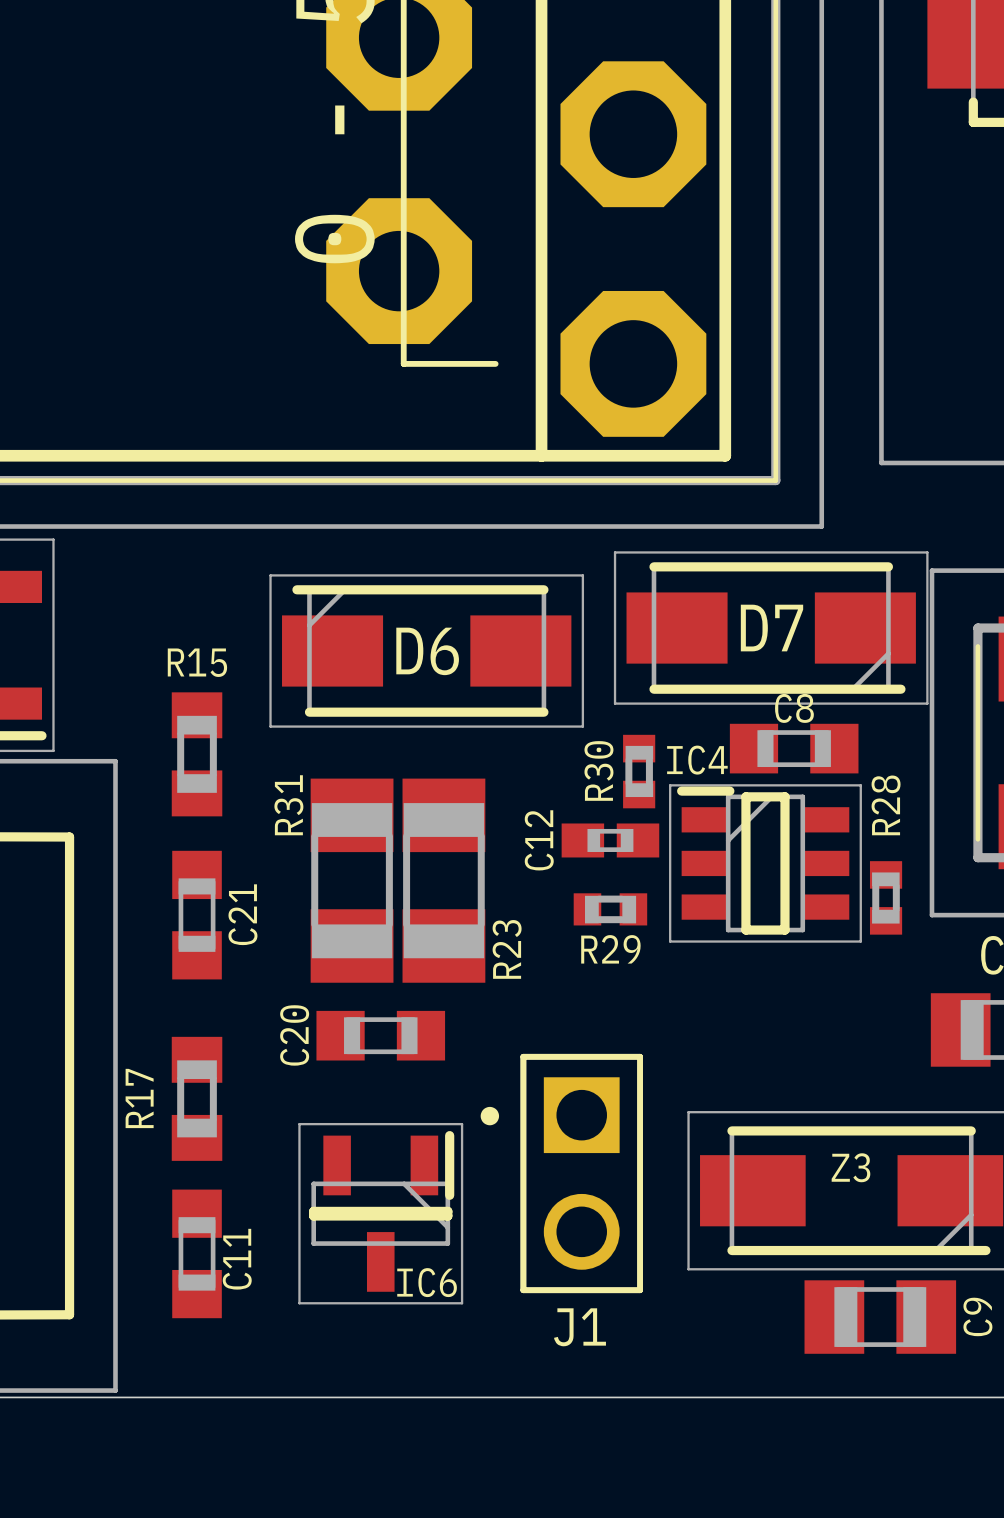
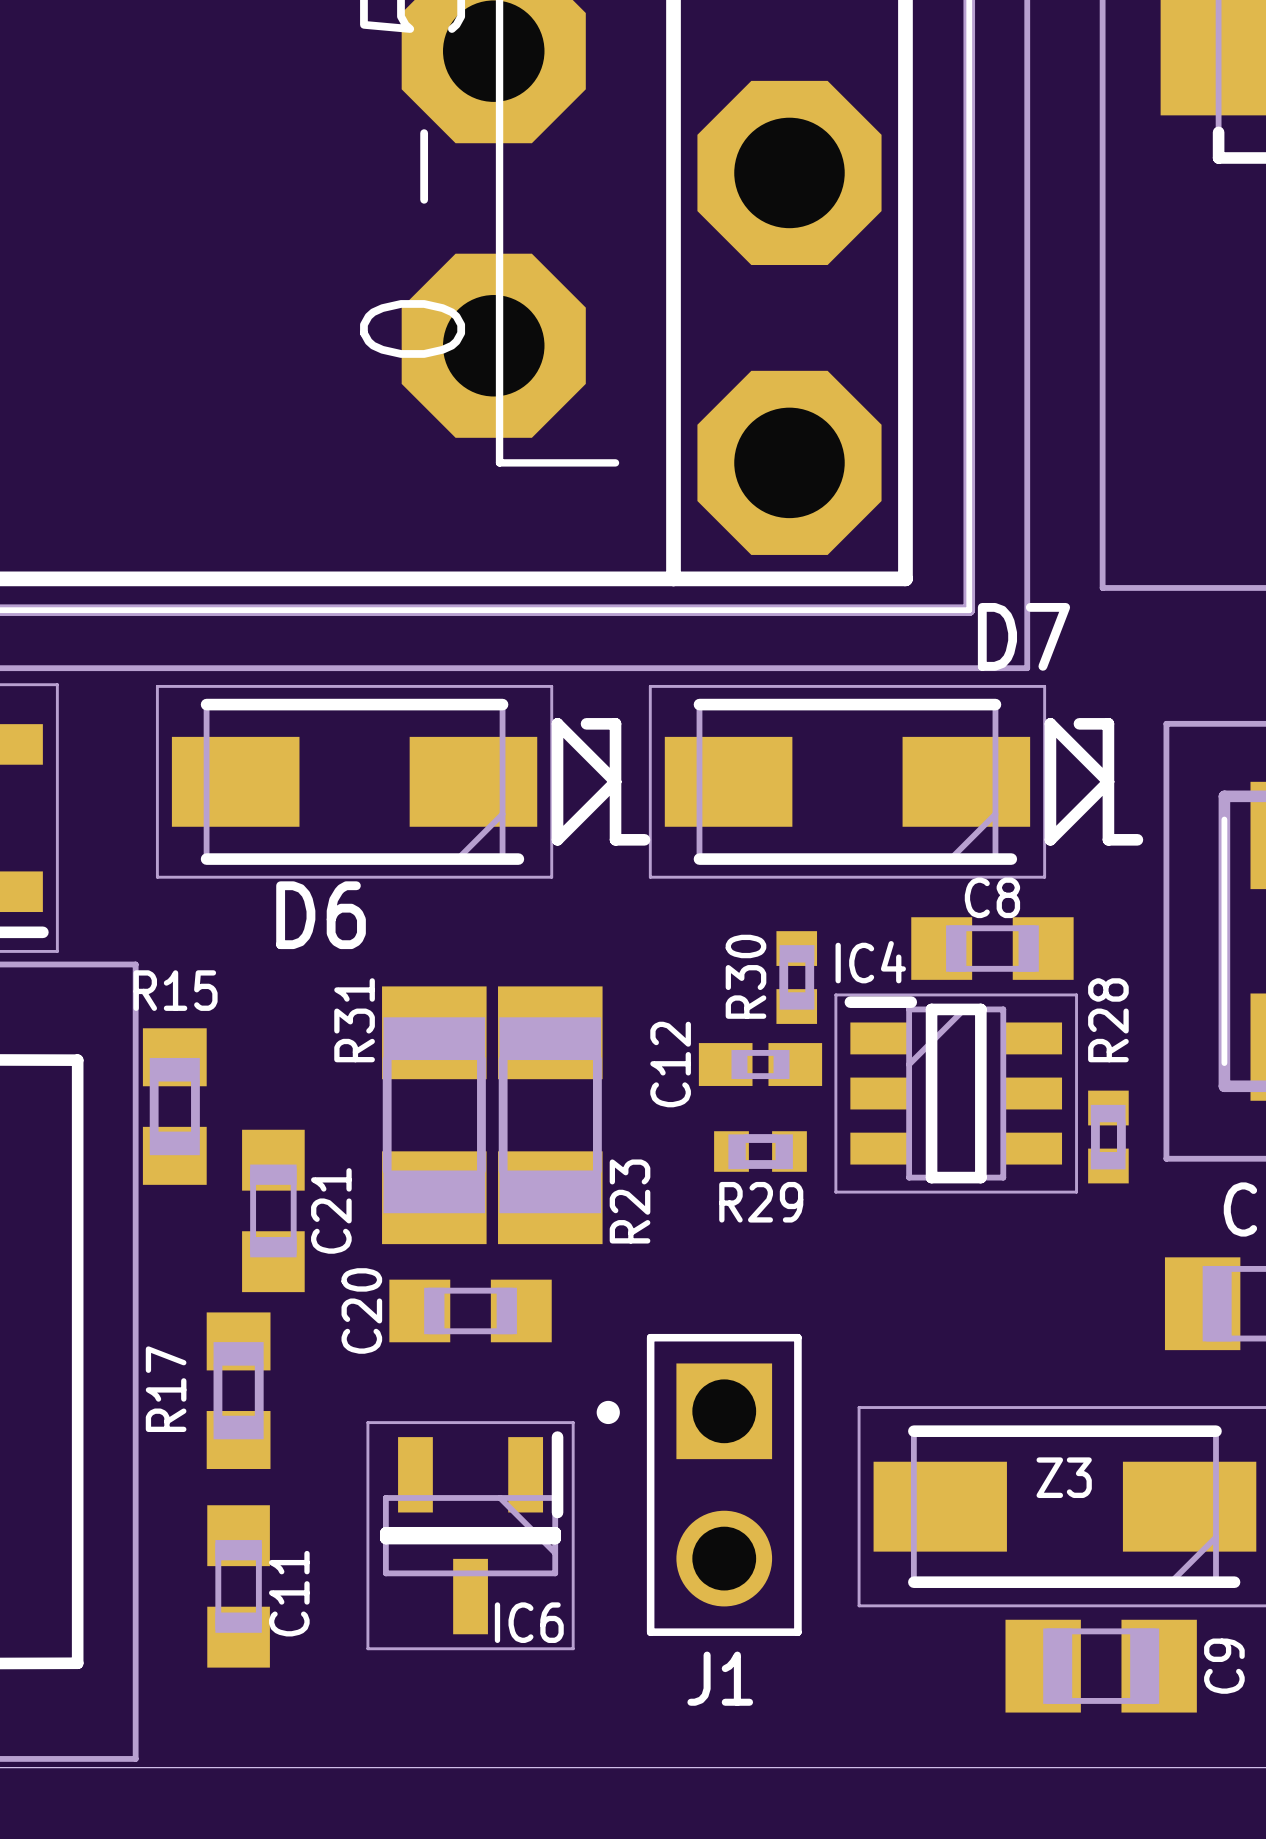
line: none -> (557, 723) (557, 839) (615, 781) (557, 723)
line: none -> (586, 723) (615, 723) (615, 839) (644, 839)
line: none -> (1050, 723) (1050, 839) (1108, 781) (1050, 723)
line: none -> (1079, 723) (1108, 723) (1108, 839) (1137, 839)
D7 position: (771, 628) -> (847, 781)
D7 name position: D7 (771, 628) -> D7 (1023, 636)
D6 rotation: 0° (426, 650) -> 180° (354, 781)
D6 name position: D6 (427, 651) -> D6 (321, 915)
R15 position: (197, 754) -> (174, 1106)
C21 position: (197, 915) -> (273, 1210)

